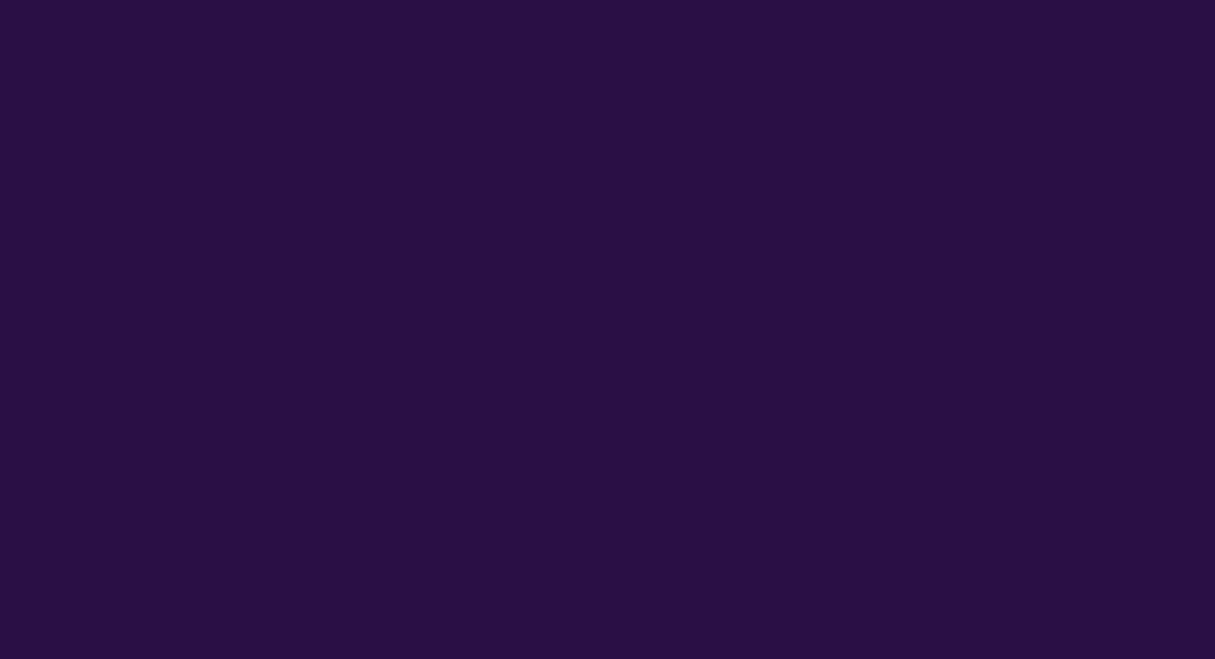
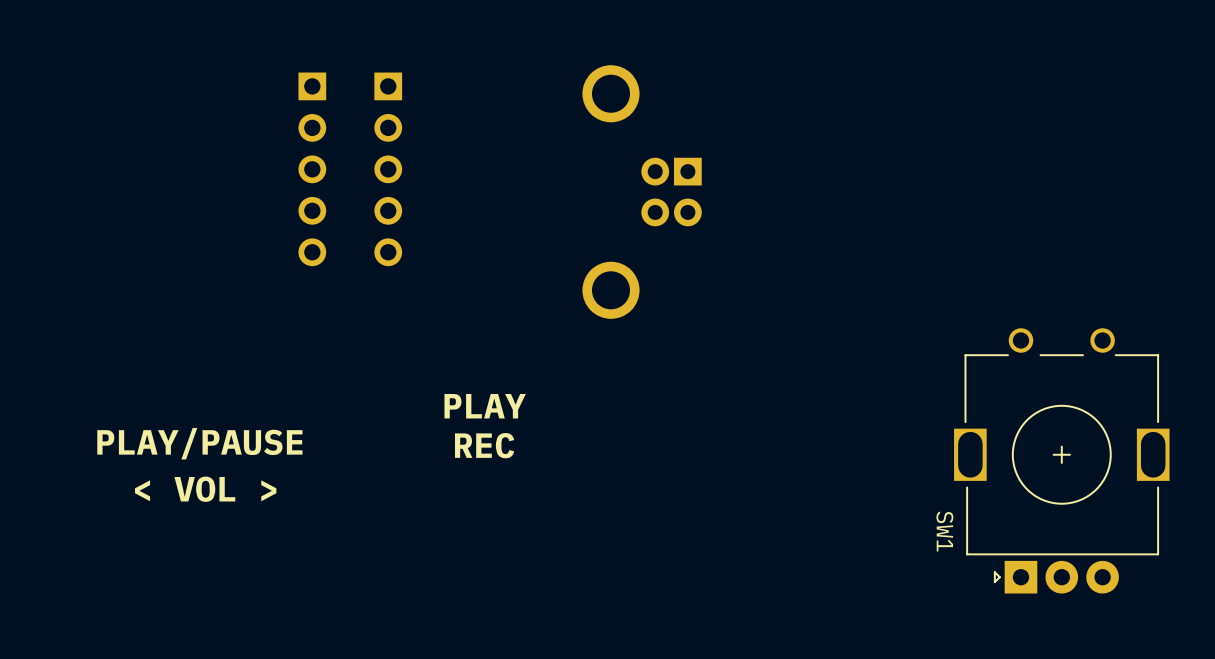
part: none -> (312, 169)
part: none -> (388, 169)
part: none -> (642, 192)
text: none -> PLAY (485, 406)
text: none -> PLAY/PAUSE (199, 443)
text: none -> REC (484, 445)
SW1: none -> (1061, 460)
text: none -> < VOL > (205, 489)

